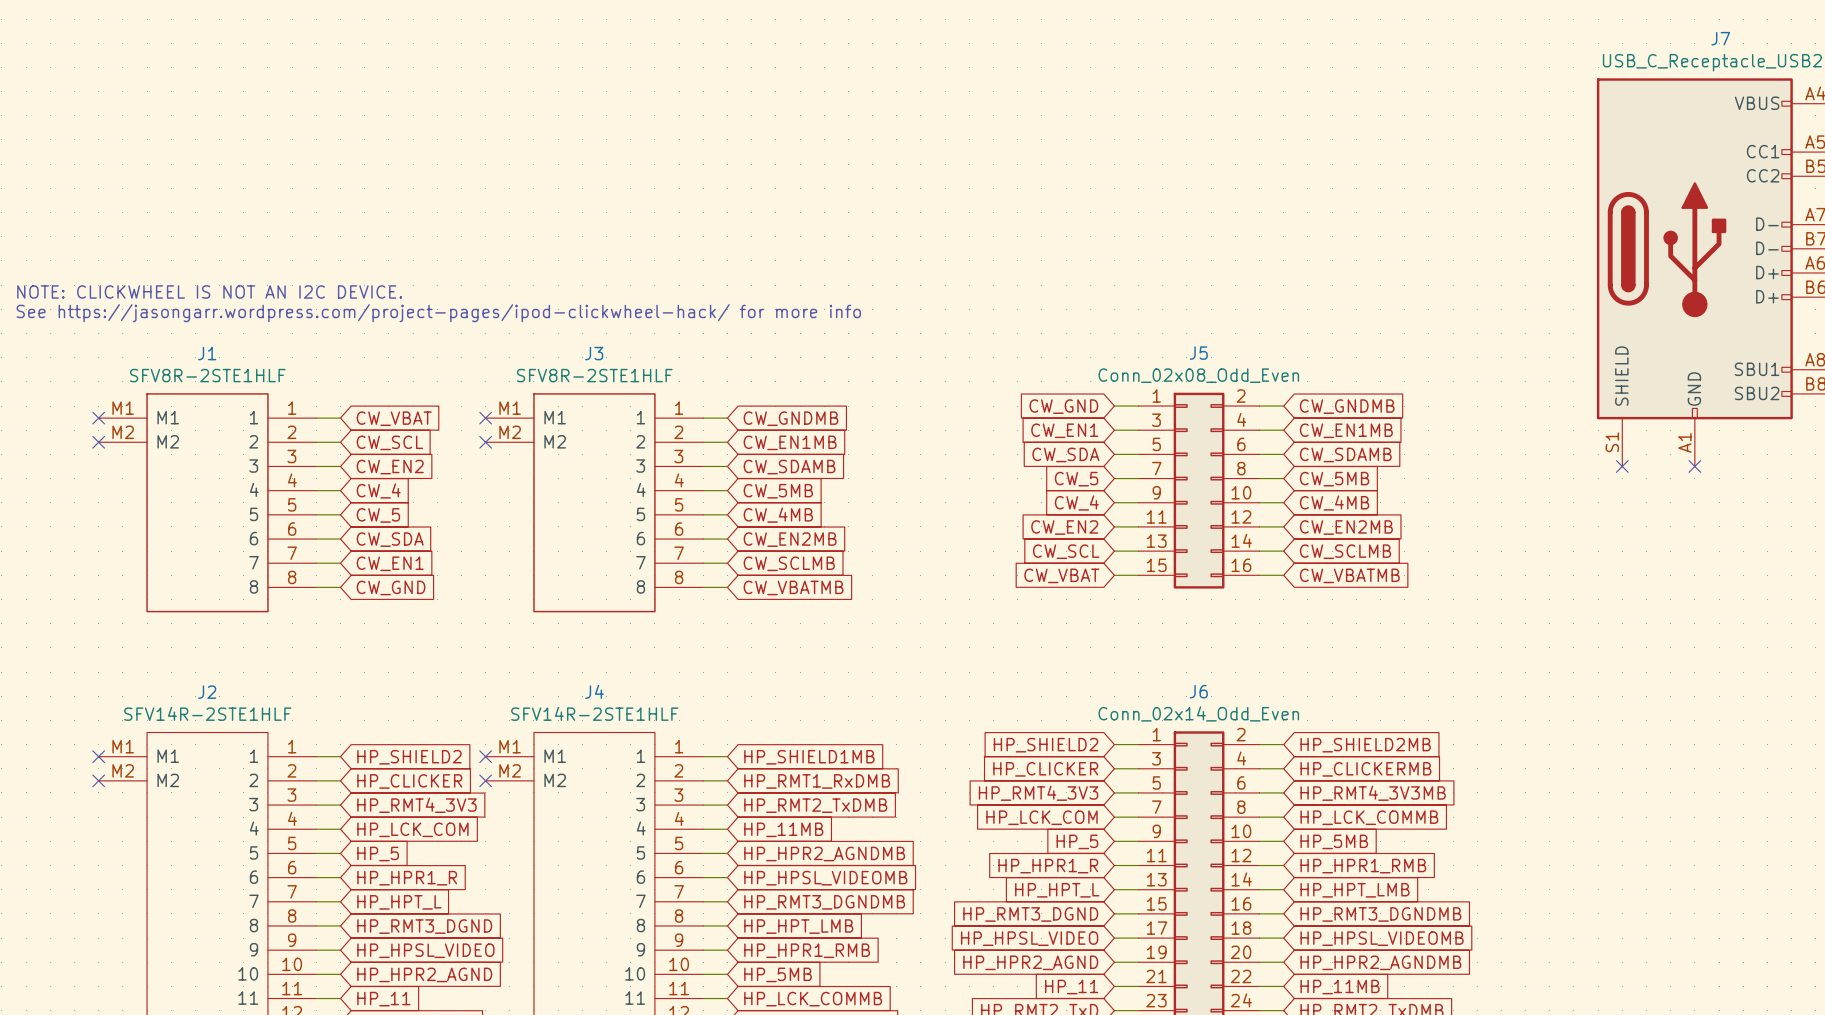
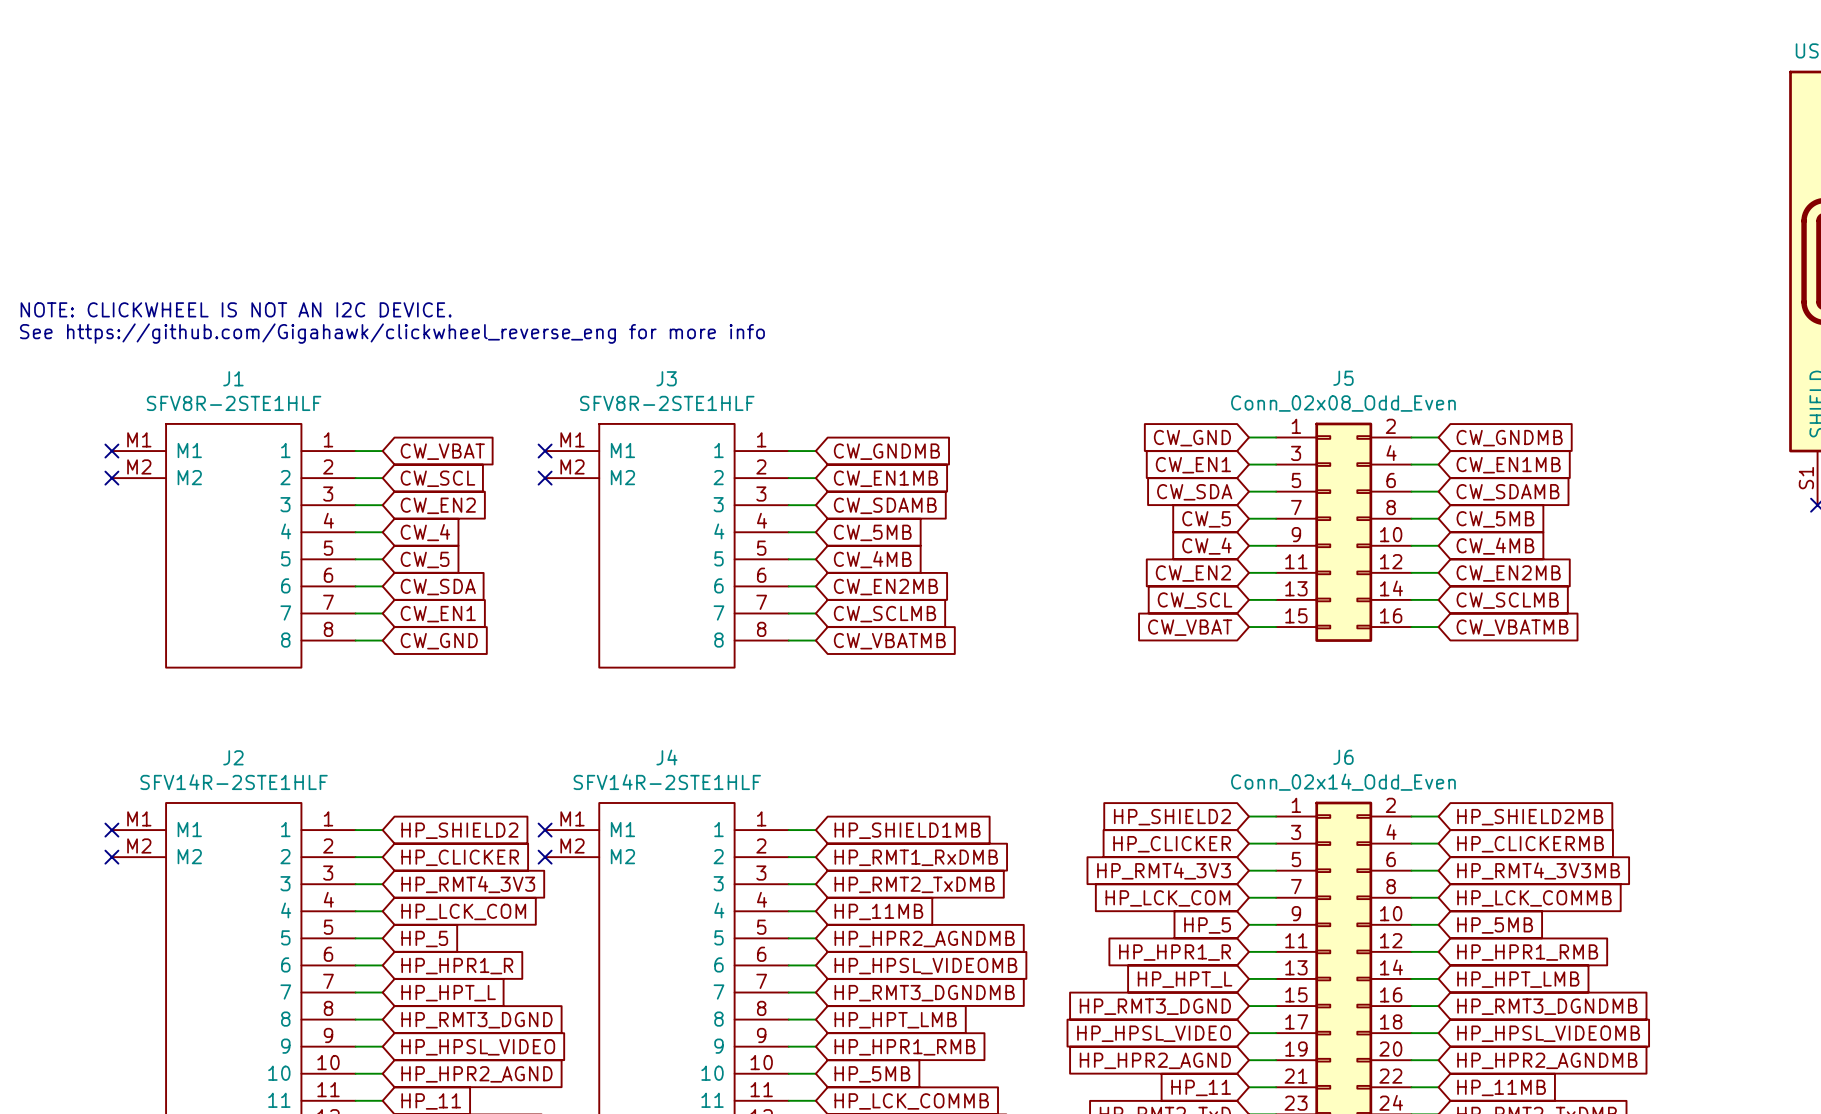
text: See https://jasongarr.wordpress.com/project-pages/ipod-clickwheel-hack/ for more info (438, 313) -> See https://github.com/Gigahawk/clickwheel_reverse_eng for more info (392, 333)

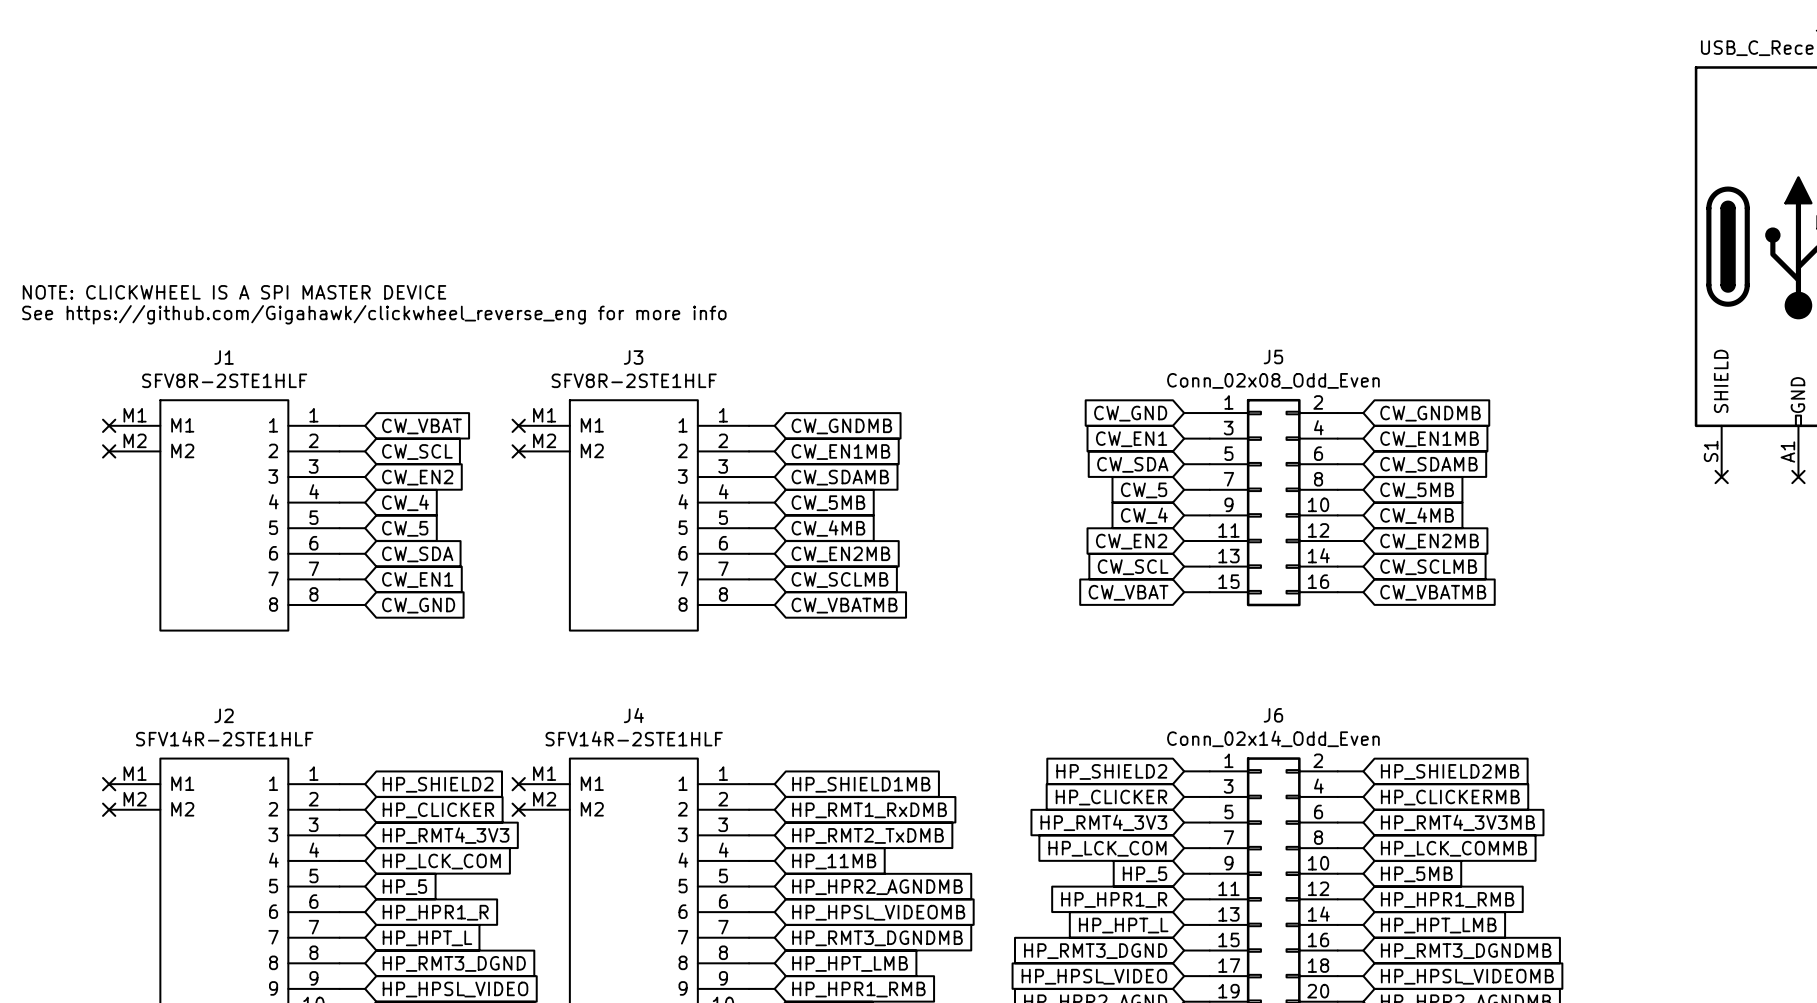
text: NOTE: CLICKWHEEL IS NOT AN I2C DEVICE. (236, 309) -> NOTE: CLICKWHEEL IS A SPI MASTER DEVICE (234, 292)

